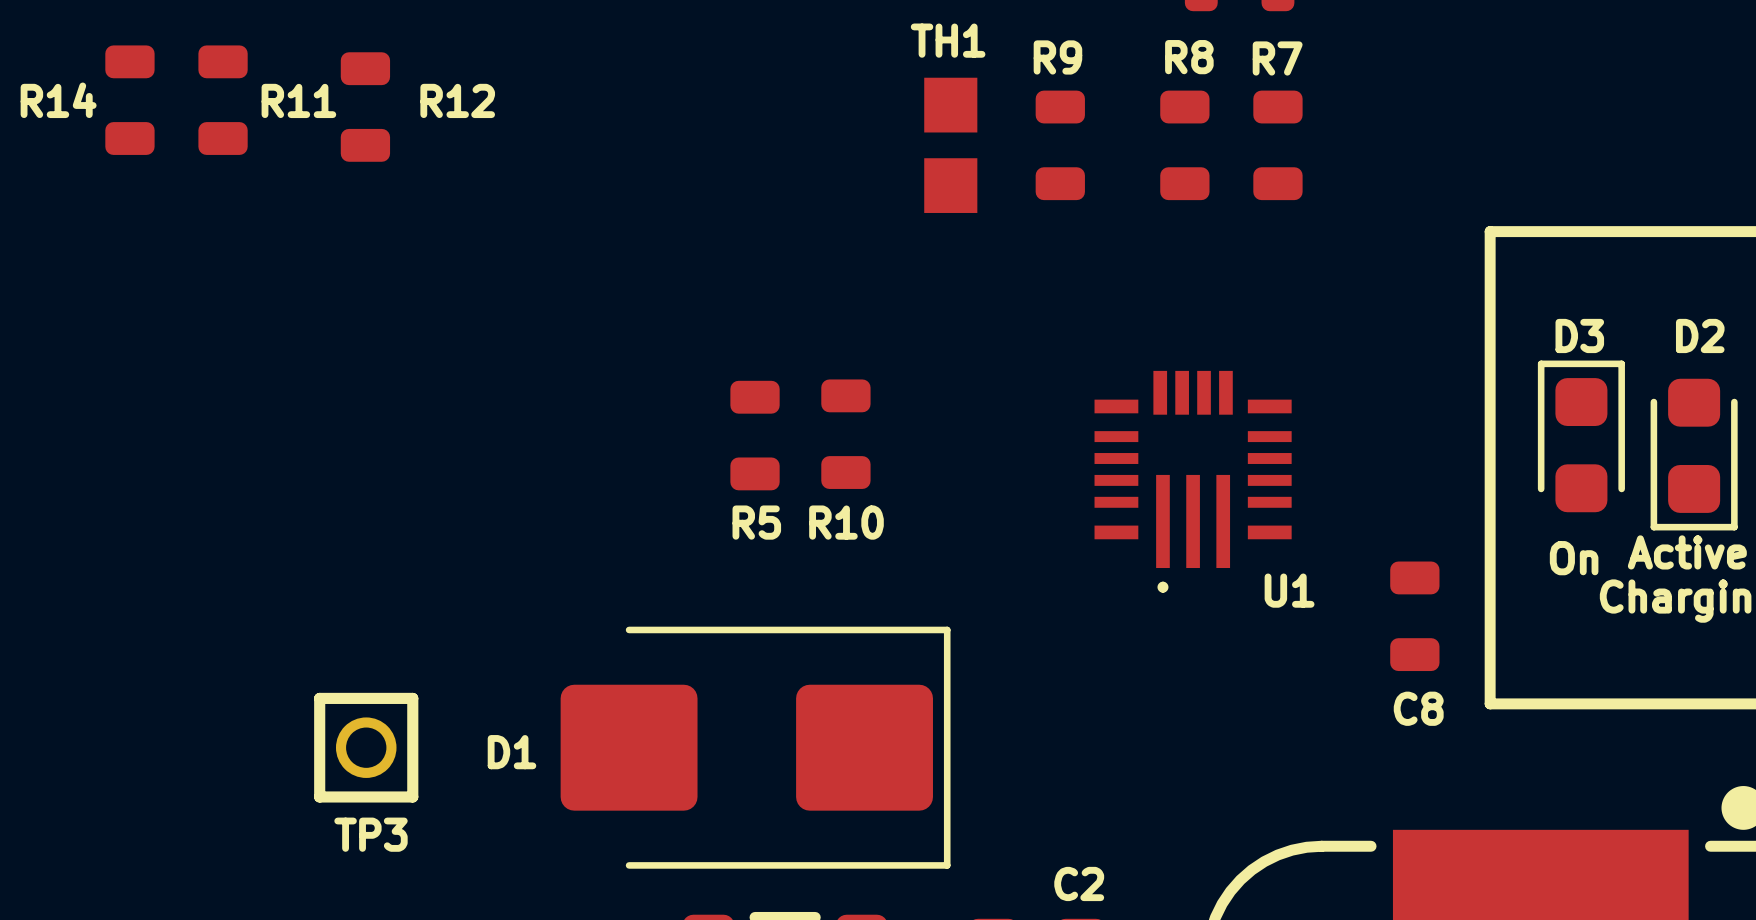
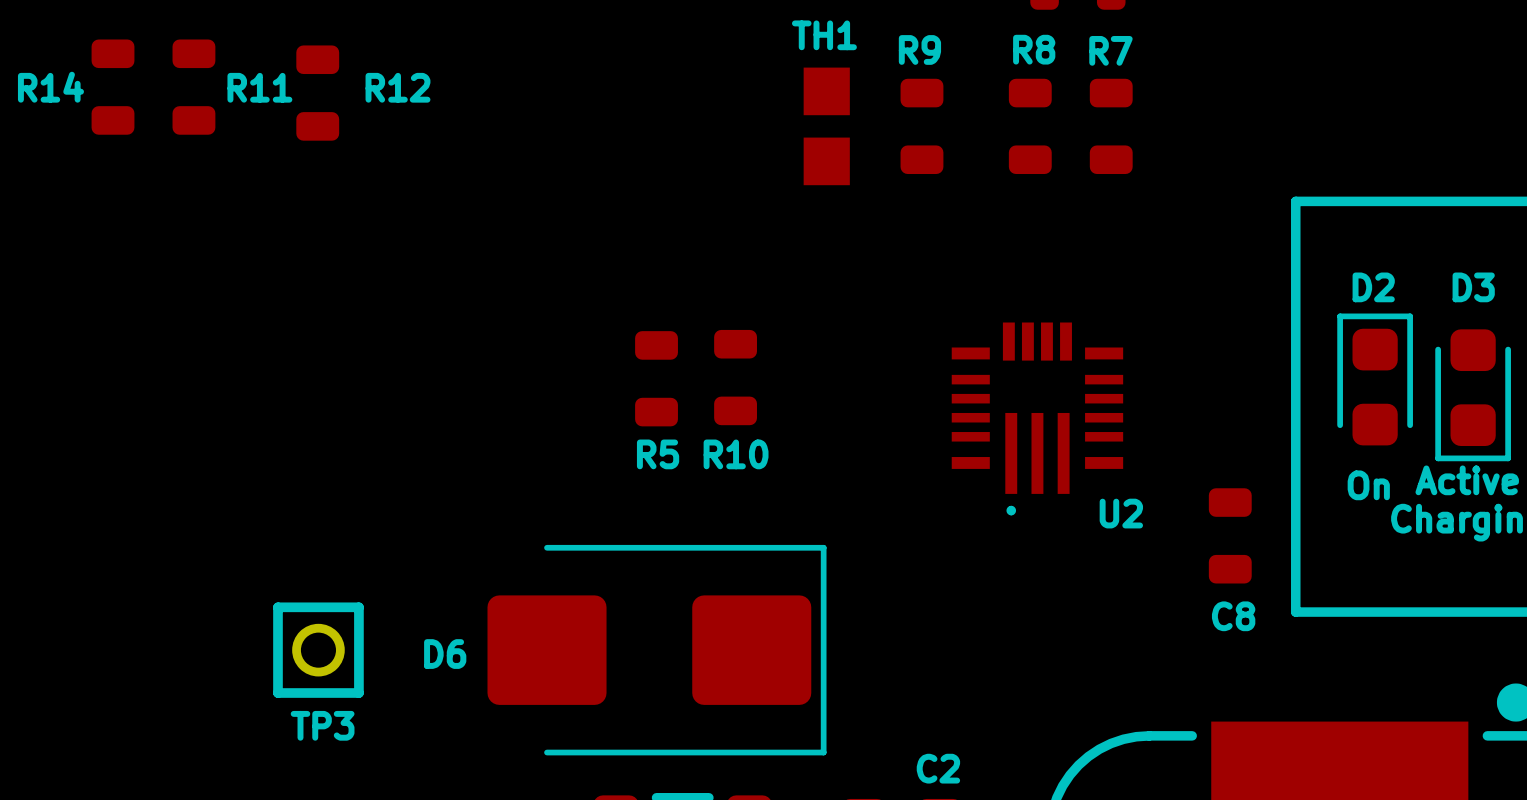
D3 name position: D3 (1579, 335) -> D3 (1473, 287)
D2 name position: D2 (1700, 335) -> D2 (1373, 287)
U1 name: U1 (1289, 590) -> U2 (1121, 513)
D1 name: D1 (512, 752) -> D6 (445, 654)

